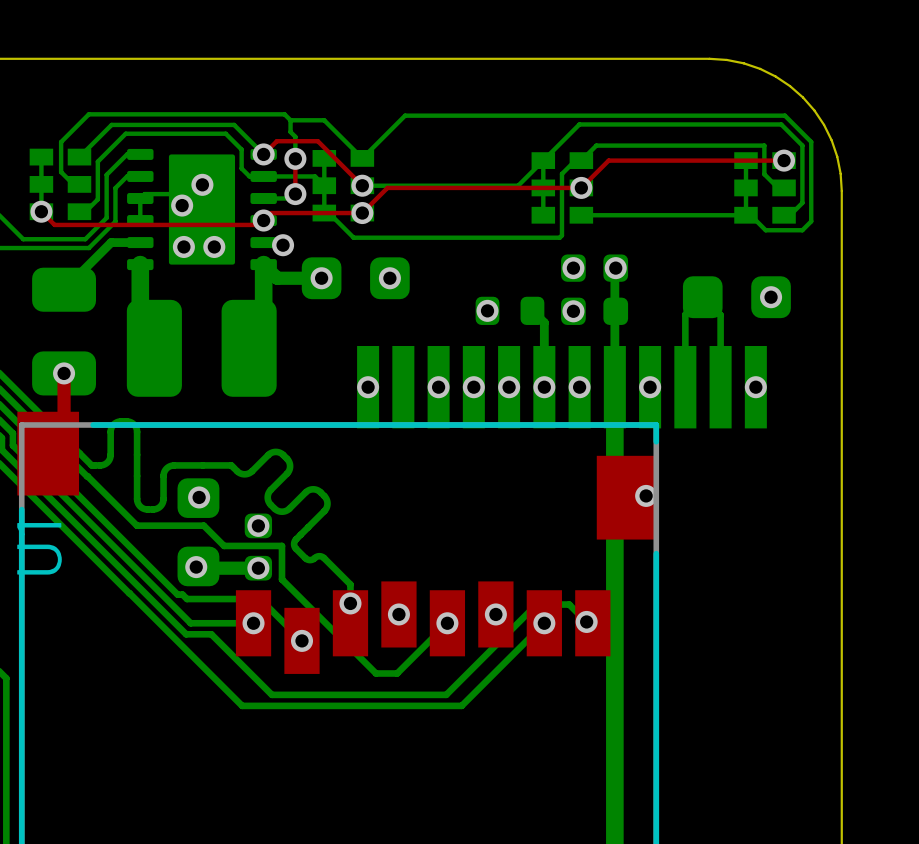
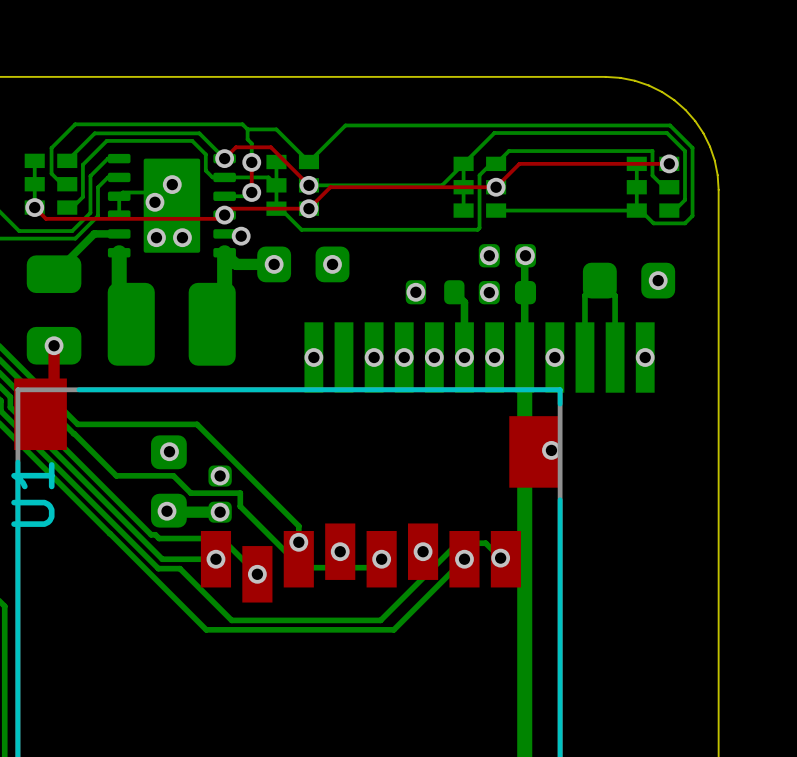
bottom track: (100, 465) (105, 463) (110, 458) (111, 427) (115, 423) (121, 421) (131, 422) (136, 429) (137, 498) (141, 507) (154, 509) (161, 505) (163, 500) (164, 472) (168, 467) (174, 465) -> (84, 424) (148, 424)
bottom track: (237, 471) (243, 474) (249, 473) (272, 452) (278, 452) (283, 455) (289, 461) (289, 468) (268, 492) (267, 499) (270, 504) -> (201, 429) (230, 458)
bottom track: (274, 508) (279, 511) (286, 510) (309, 489) (315, 489) (320, 492) (326, 500) (326, 508) (296, 539) (294, 544) (295, 548) (307, 559) (311, 559) (318, 556) (324, 558) -> (233, 461) (276, 503)
bottom track: (282, 561) (282, 579) (376, 673) (397, 673) (437, 633) -> (240, 506) (301, 567) (373, 567)

